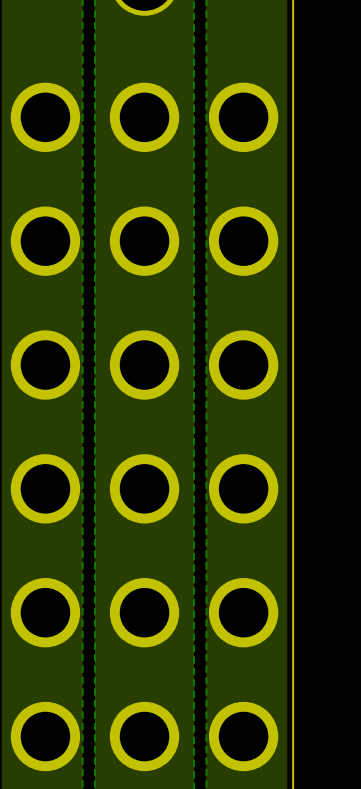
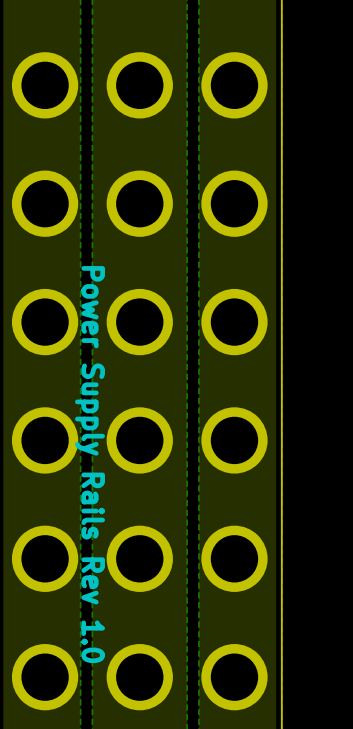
text: none -> Power Supply Rails Rev 1.0 (89, 464)

